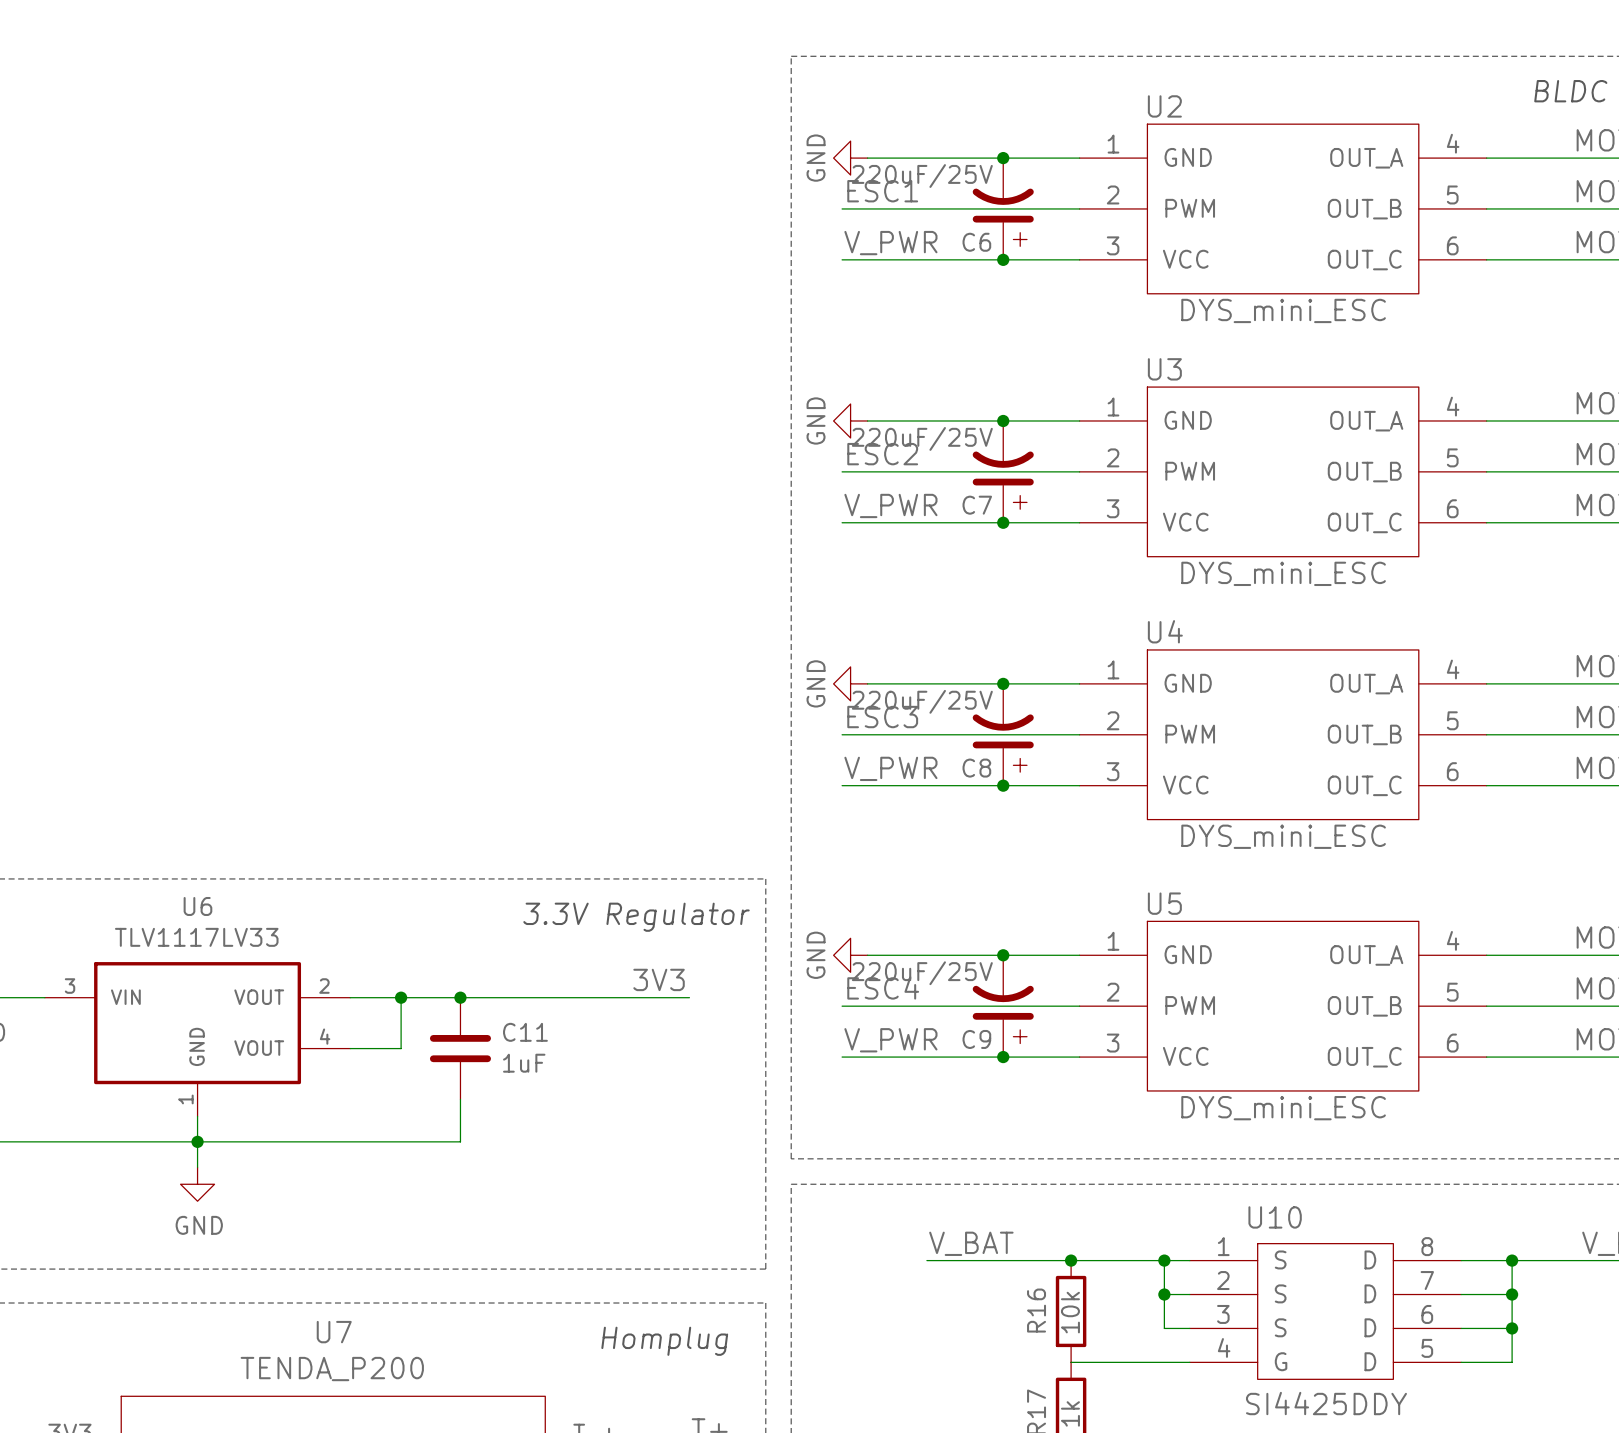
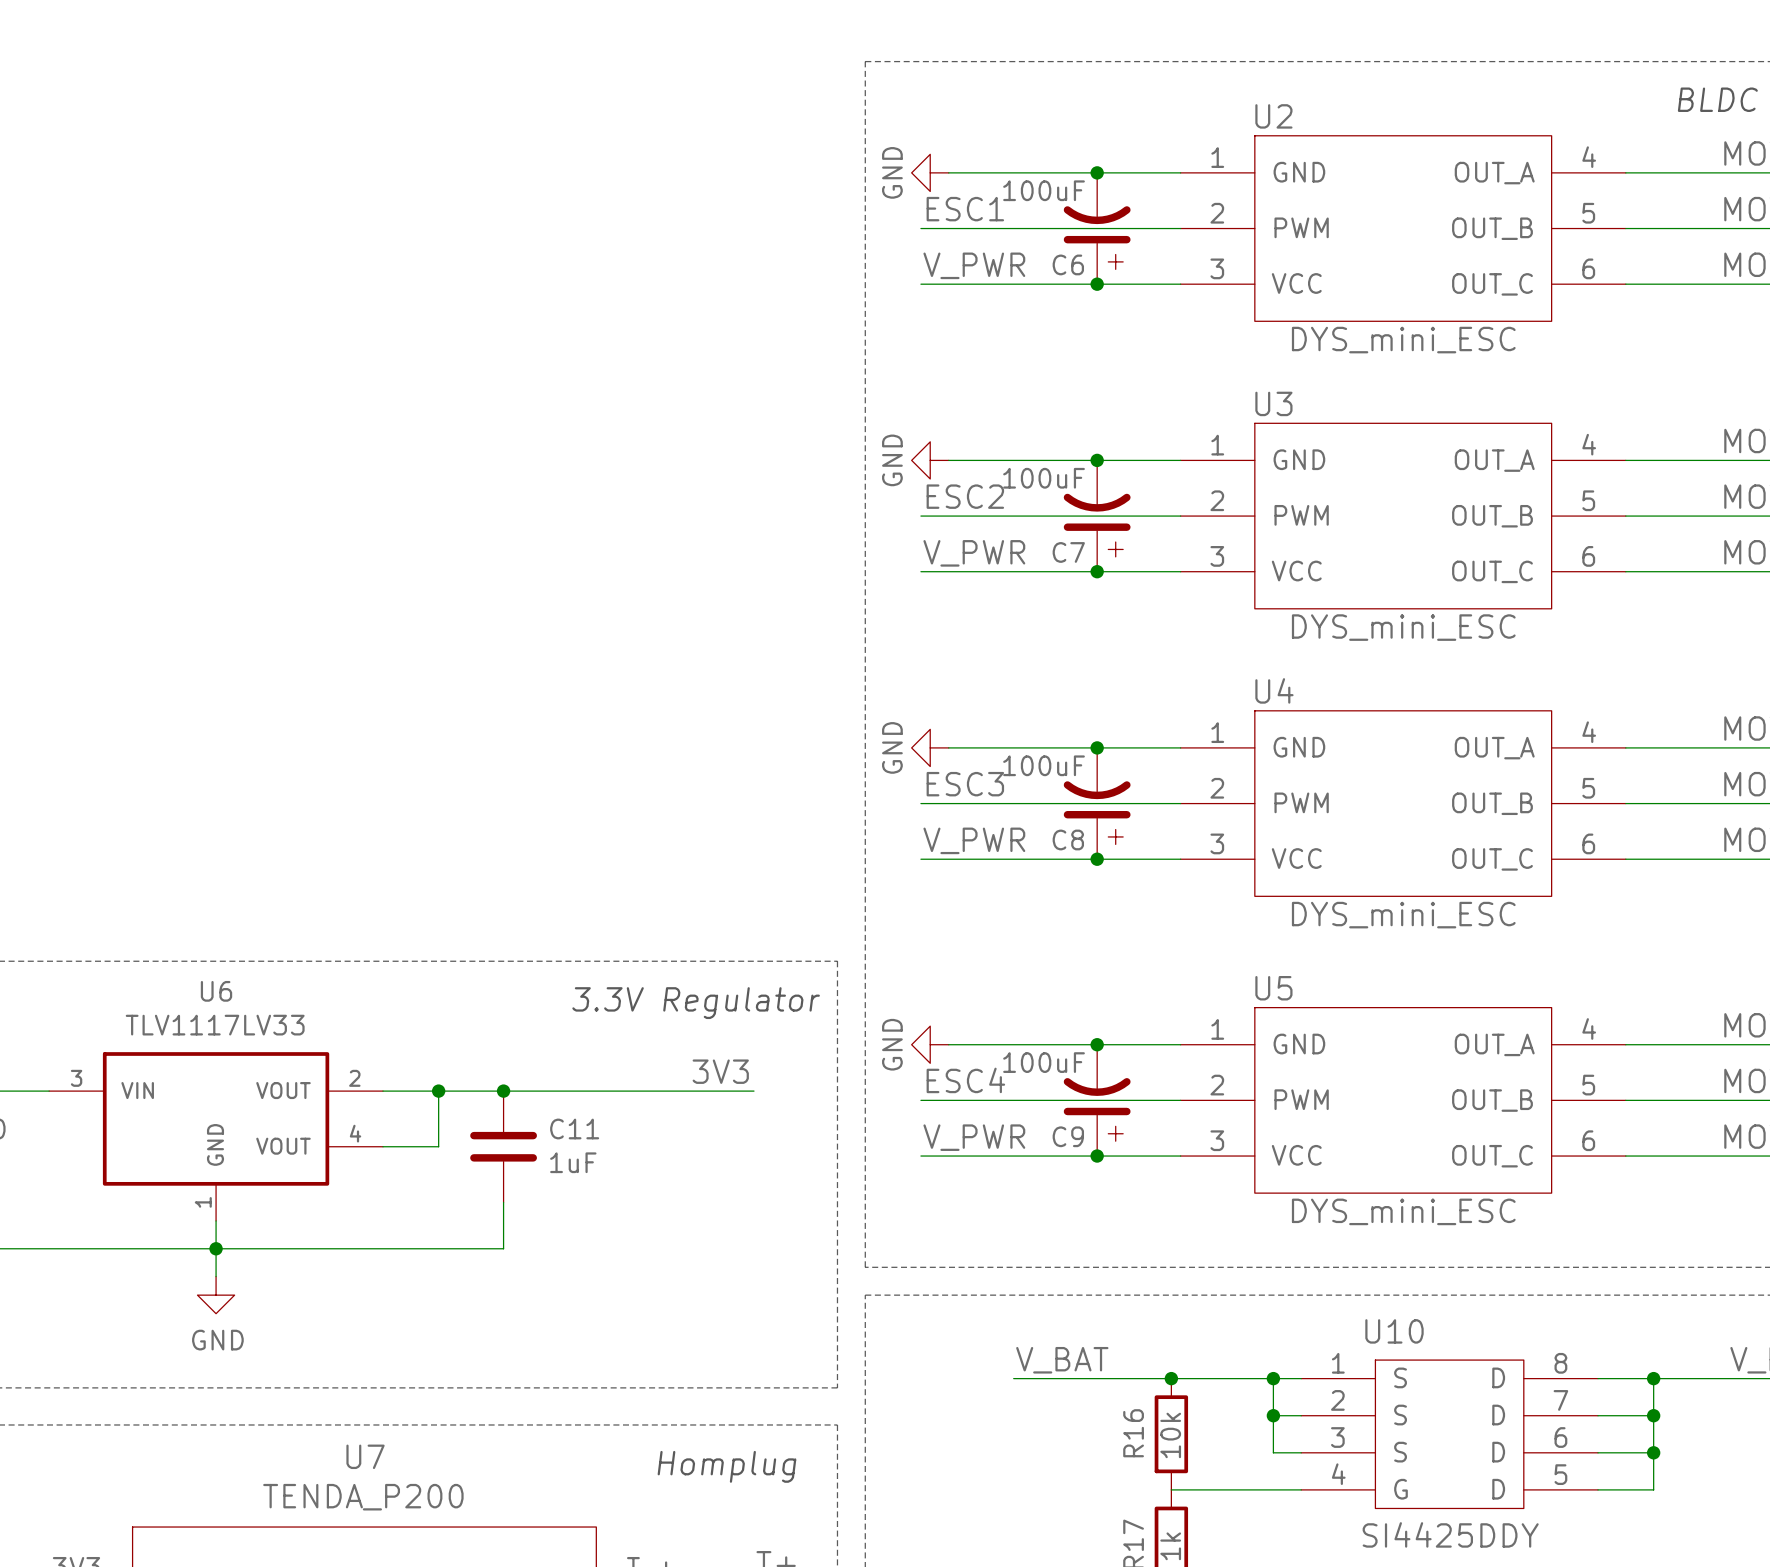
C6 value: 220uF/25V (922, 176) -> 100uF (1044, 190)
C7 value: 220uF/25V (922, 438) -> 100uF (1044, 478)
C8 value: 220uF/25V (922, 701) -> 100uF (1044, 765)
C9 value: 220uF/25V (922, 973) -> 100uF (1044, 1062)

